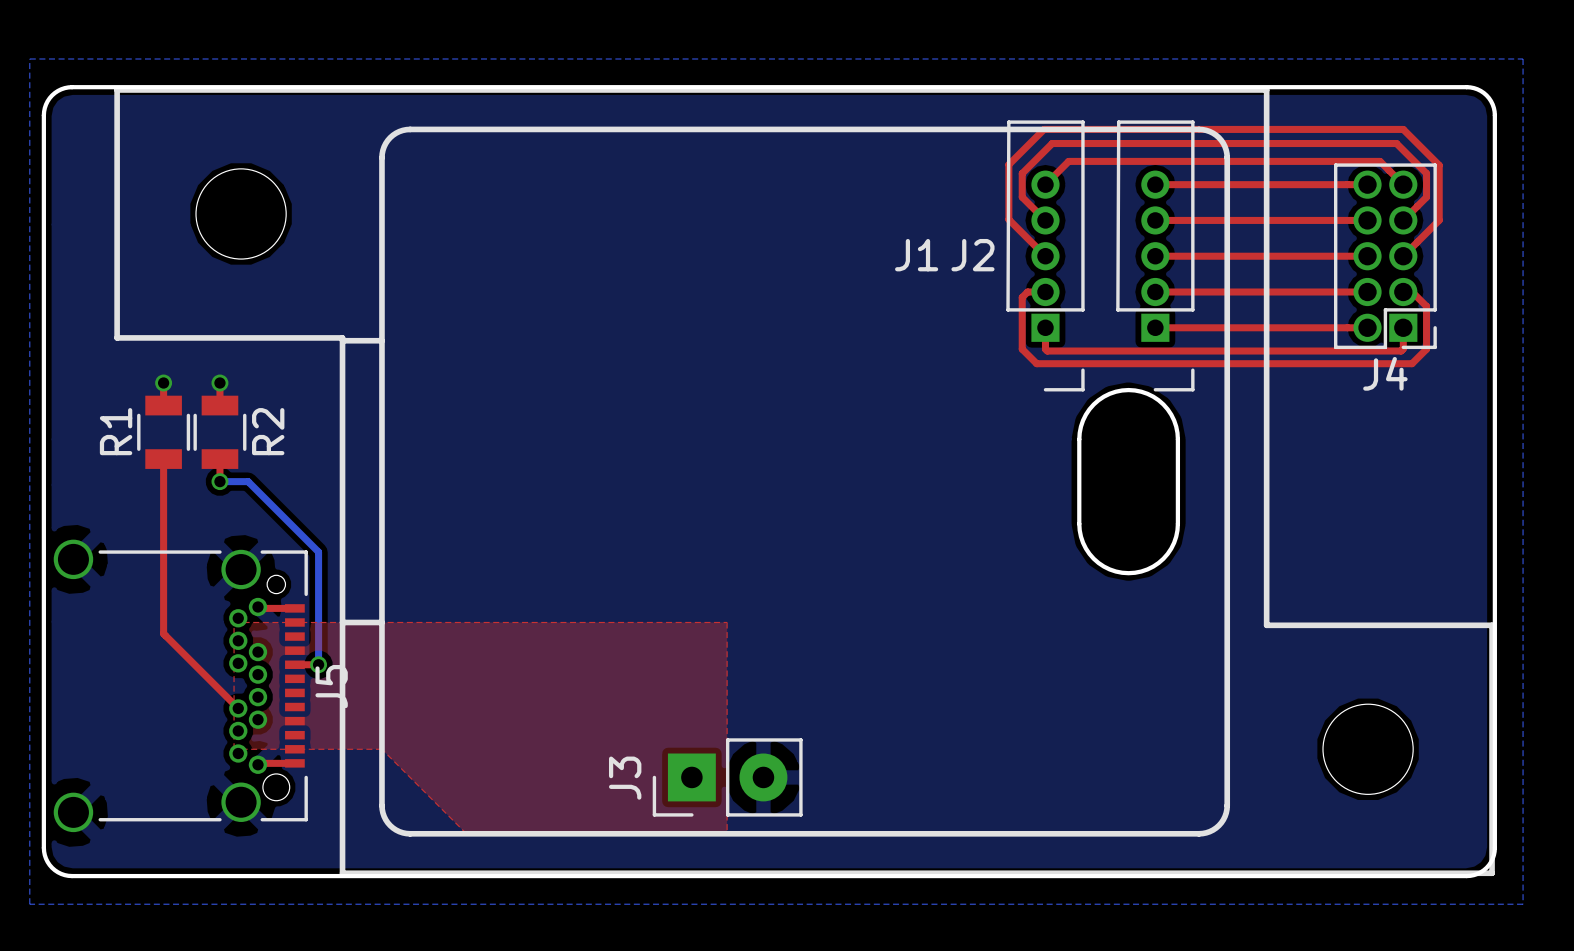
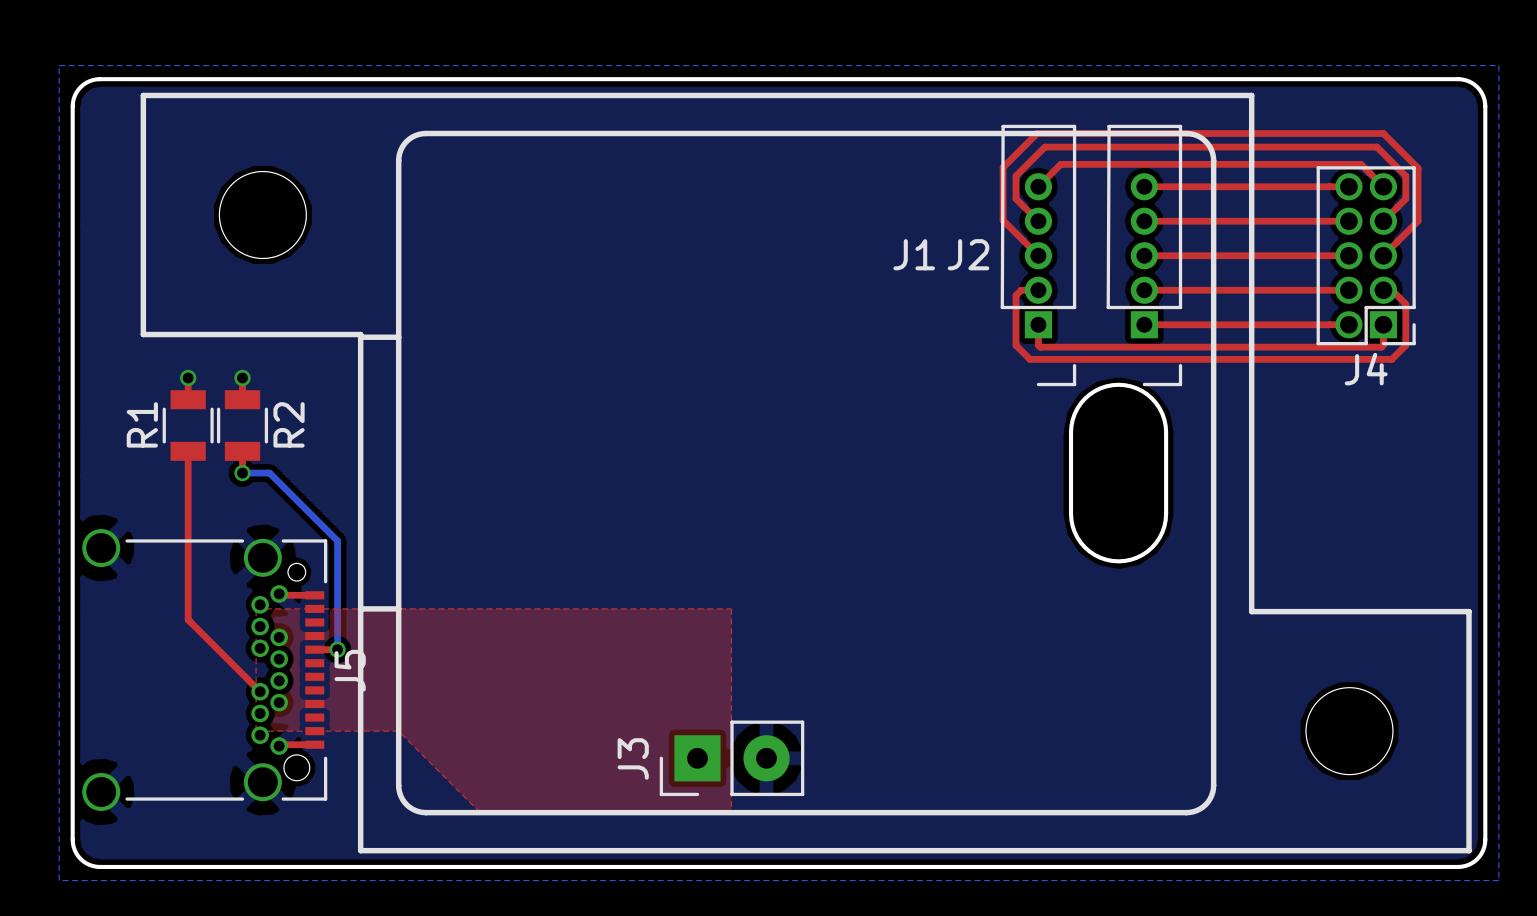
board edge: (43, 115) (46, 104) (52, 95) (61, 89) (72, 87) (1466, 87) (1477, 89) (1486, 95) (1492, 104) (1494, 115) (1494, 847) (1491, 861) (1480, 872) (1466, 876) (72, 876) (61, 873) (52, 867) (46, 858) (43, 847) -> (72, 119) (72, 102) (76, 92) (86, 82) (99, 79) (1458, 79) (1468, 81) (1477, 87) (1483, 95) (1485, 106) (1485, 839) (1481, 853) (1471, 863) (1458, 866) (99, 866) (86, 863) (76, 853) (72, 843) (72, 826)

